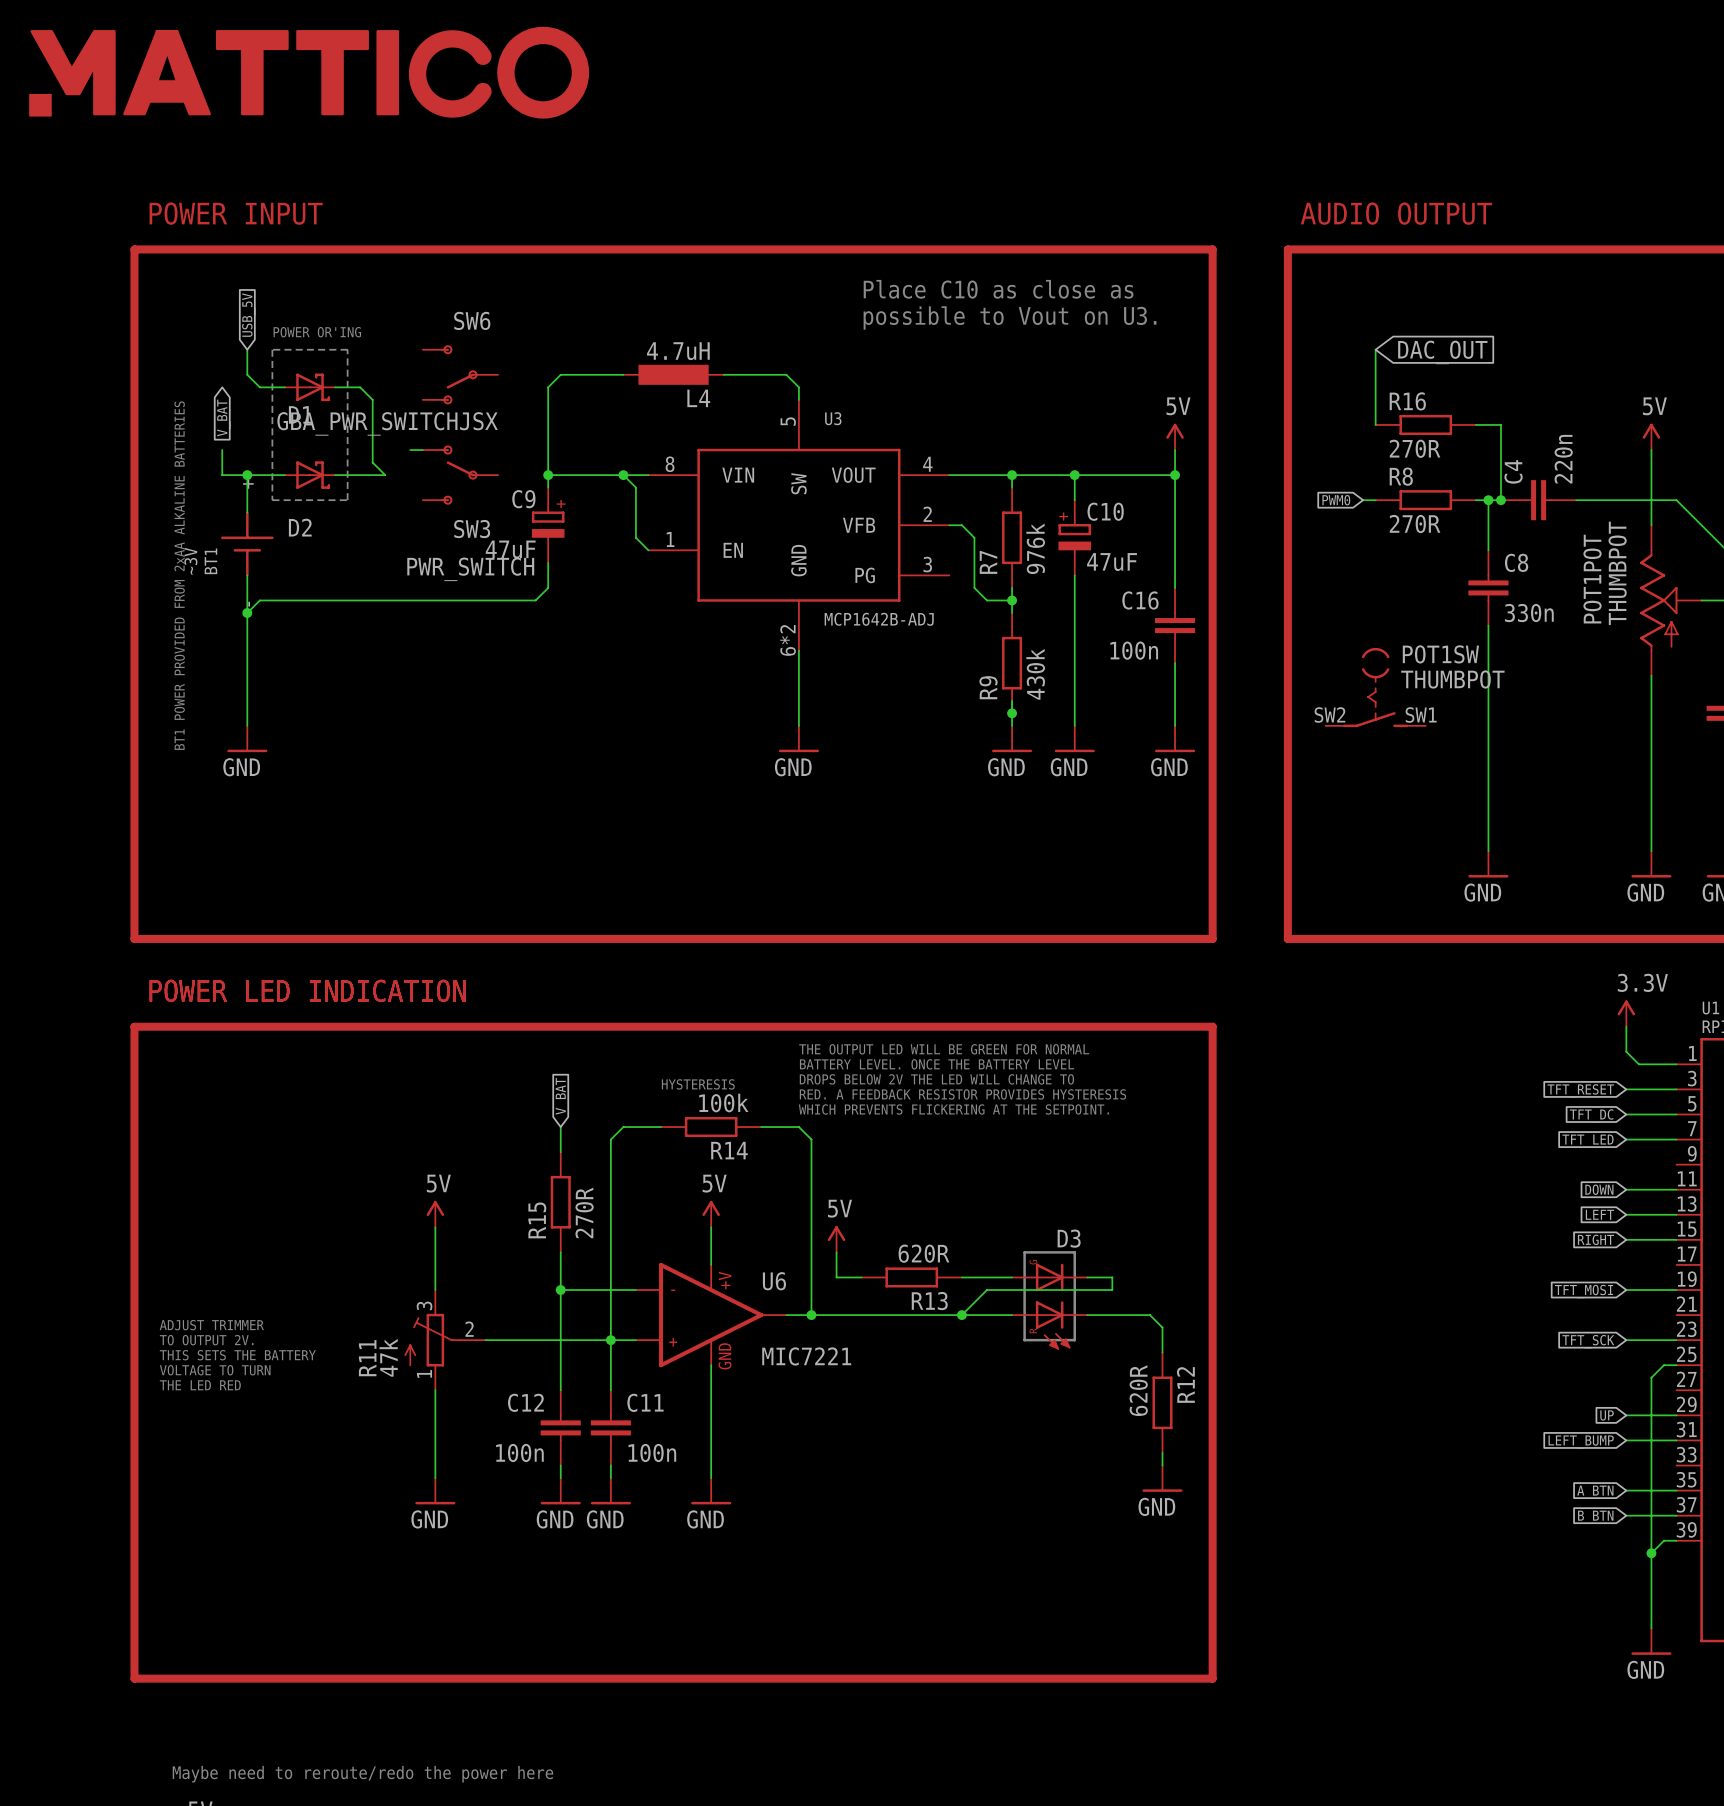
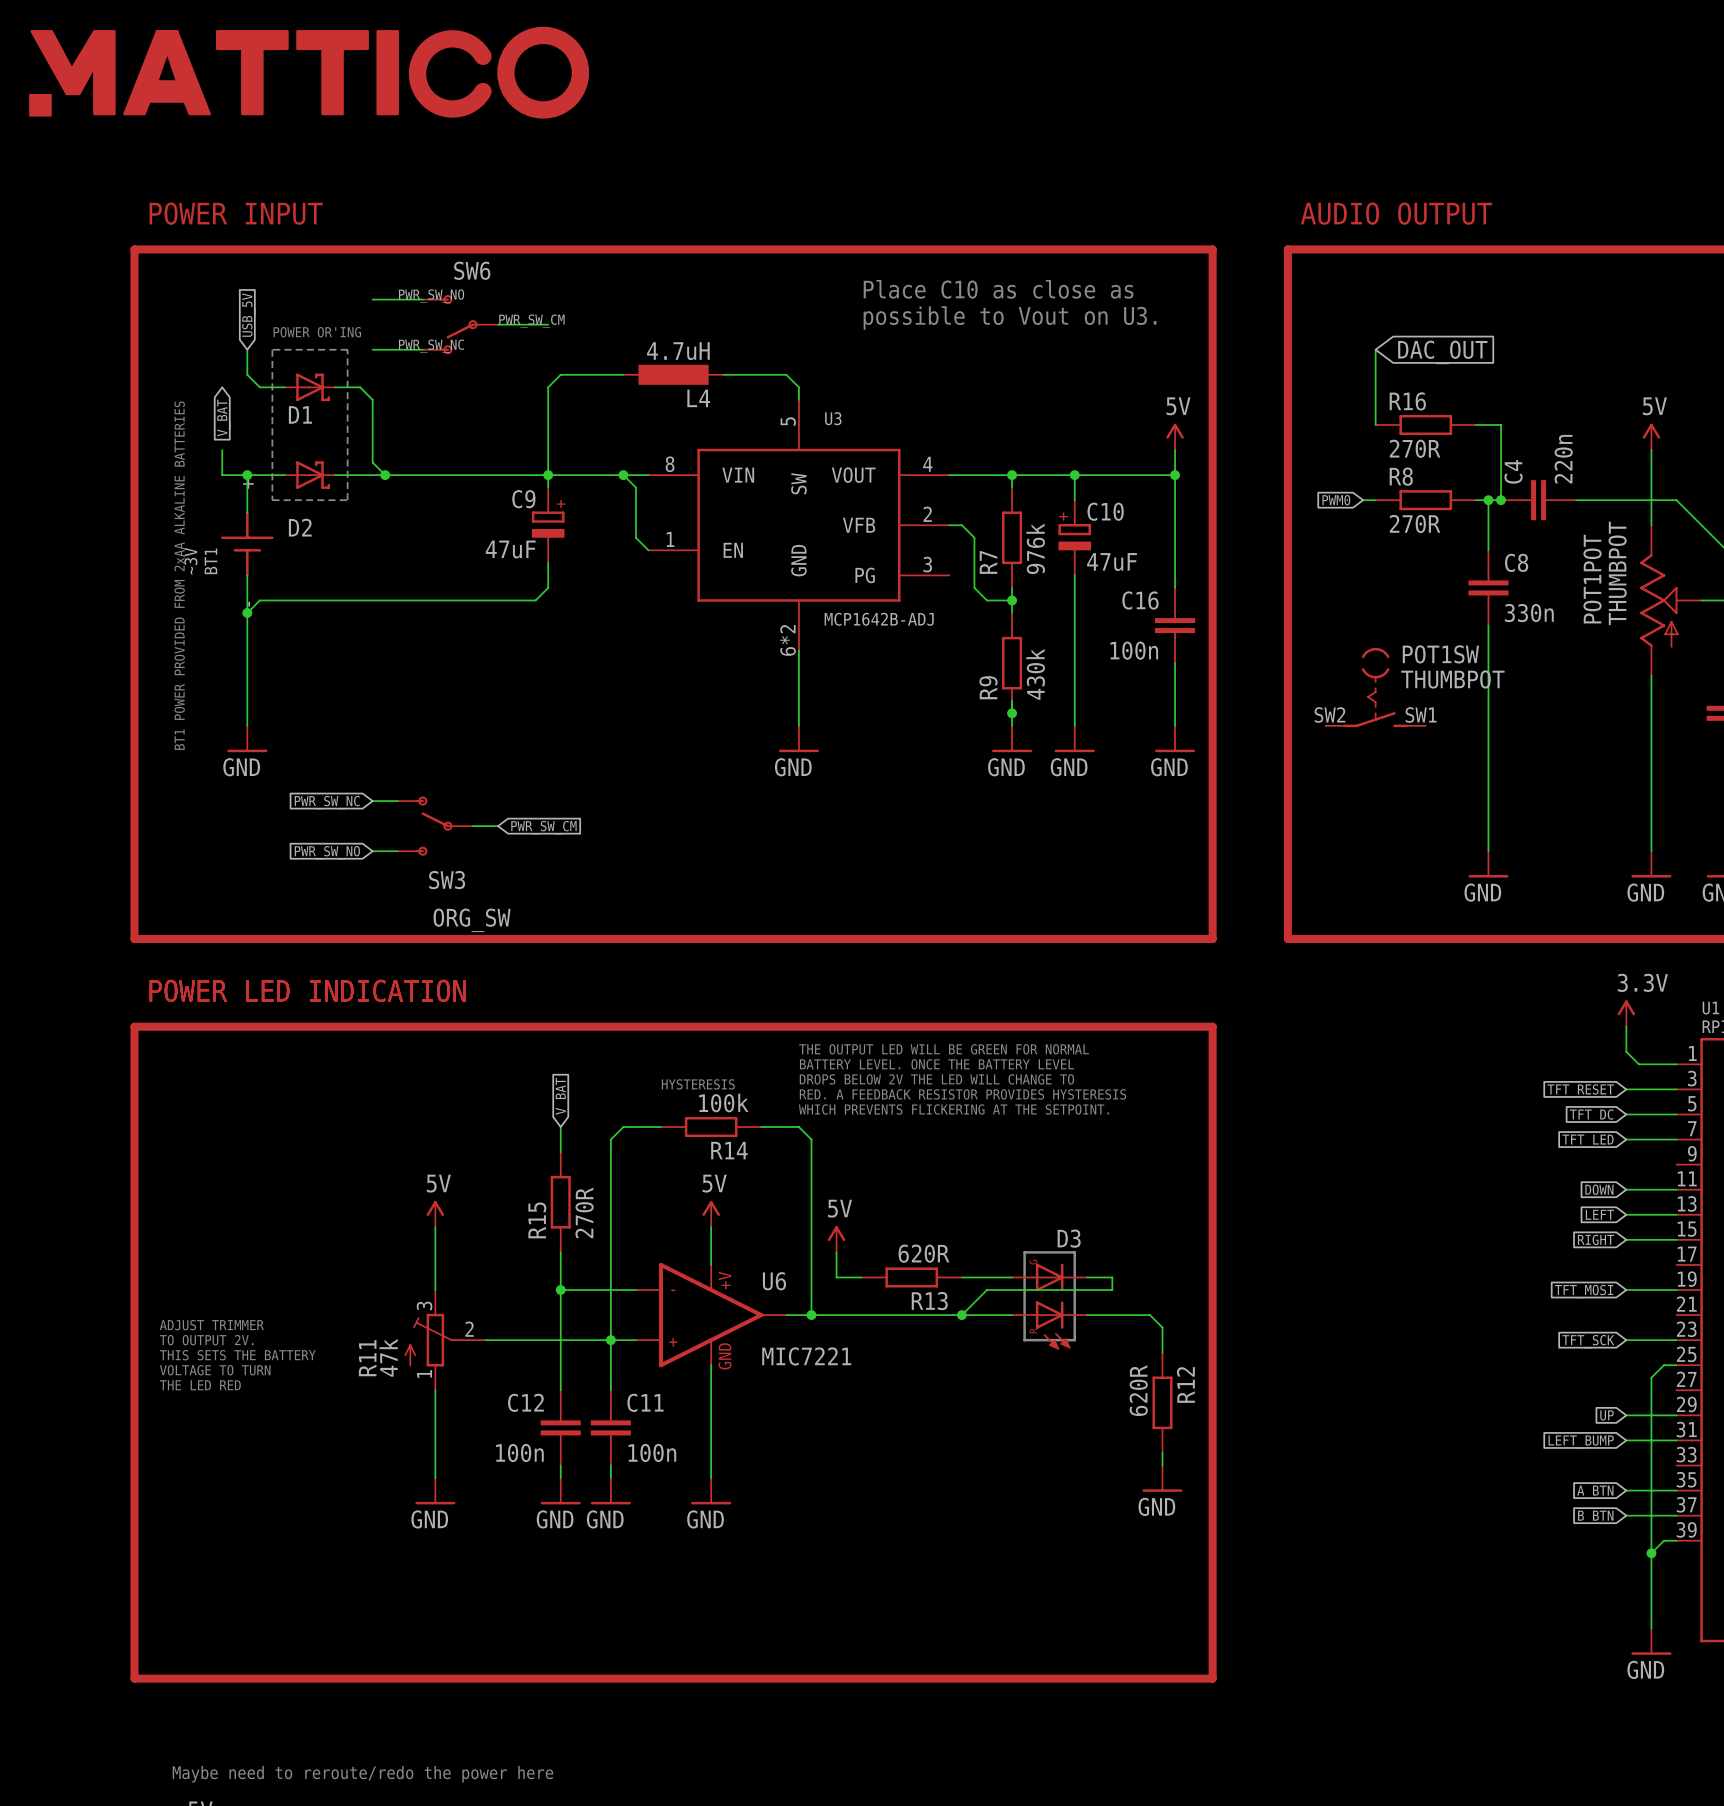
label: none -> PWR_SW_NO (431, 296)
wire: none -> (372, 299) (422, 299)
label: none -> PWR_SW_CM (531, 321)
wire: none -> (498, 324) (548, 324)
label: none -> PWR_SW_NC (431, 346)
wire: none -> (372, 349) (422, 349)
SW6 position: (460, 374) -> (460, 324)
SW6 value: GBA_PWR_SWITCHJSX (387, 423) -> none
wire: (410, 450) (422, 450) -> none
wire: none -> (385, 475) (548, 475)
junction: none -> (385, 475)
SW3 position: (460, 475) -> (435, 826)
SW3 value: PWR_SWITCH (470, 569) -> ORG_SW (472, 920)
wire: none -> (372, 801) (397, 801)
global label: none -> PWR_SW_NC (327, 802)
wire: none -> (472, 826) (498, 826)
global label: none -> PWR_SW_CM (543, 827)
wire: none -> (372, 851) (397, 851)
global label: none -> PWR_SW_NO (327, 852)

